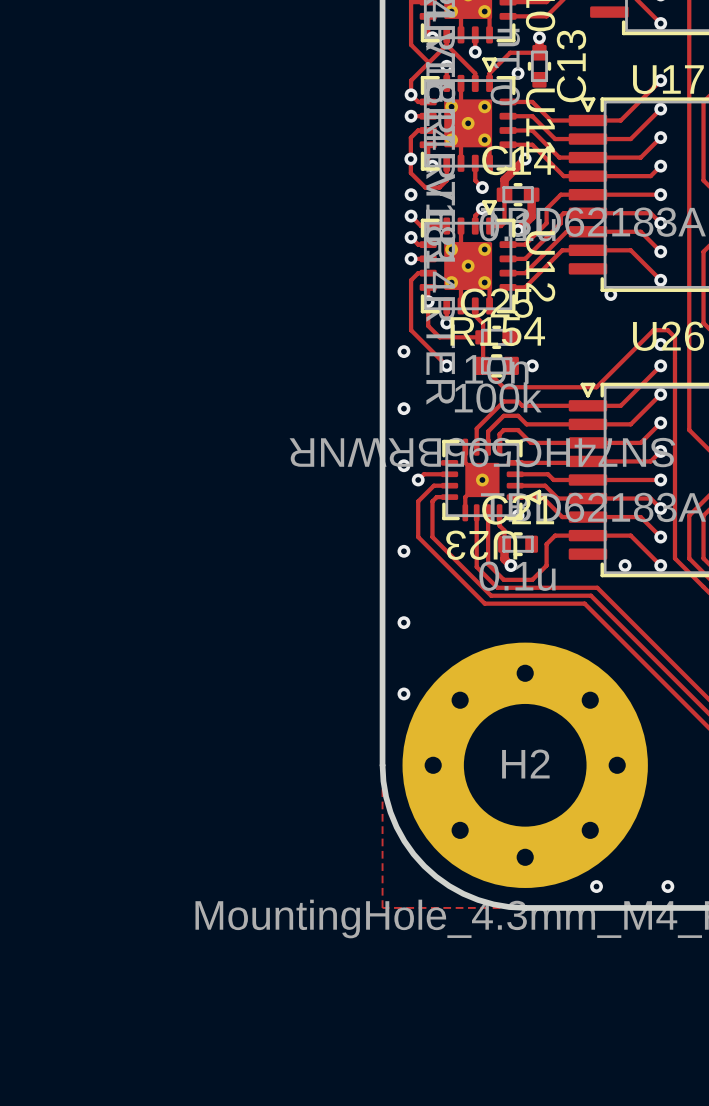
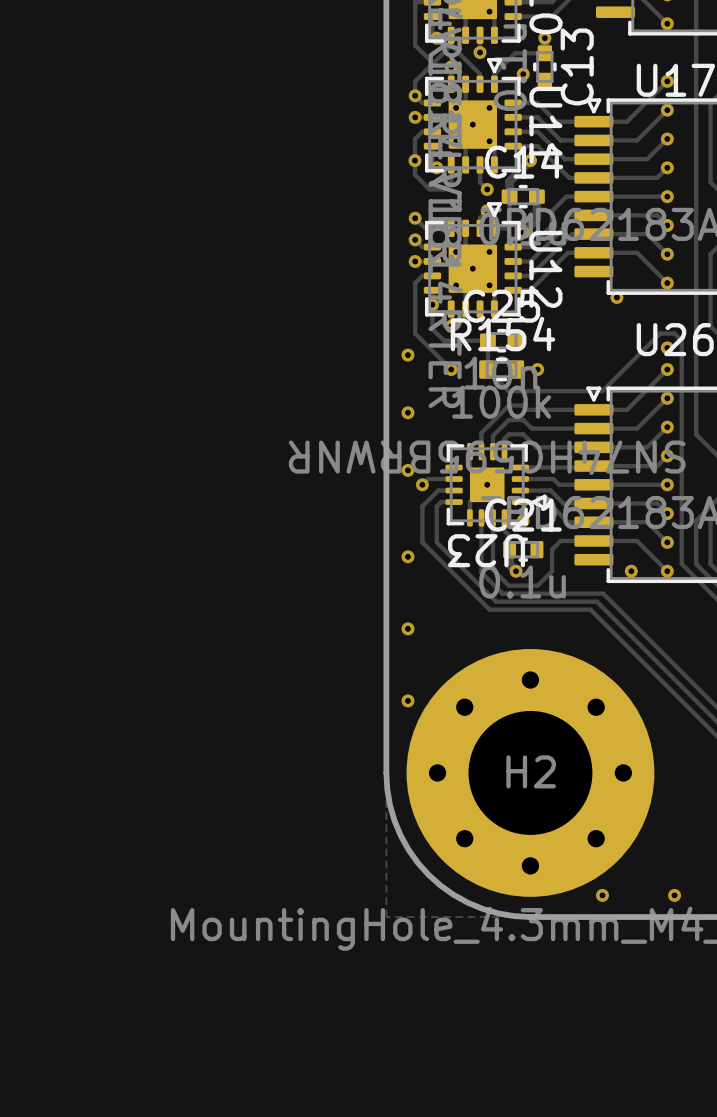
via: (411, 194) -> none

